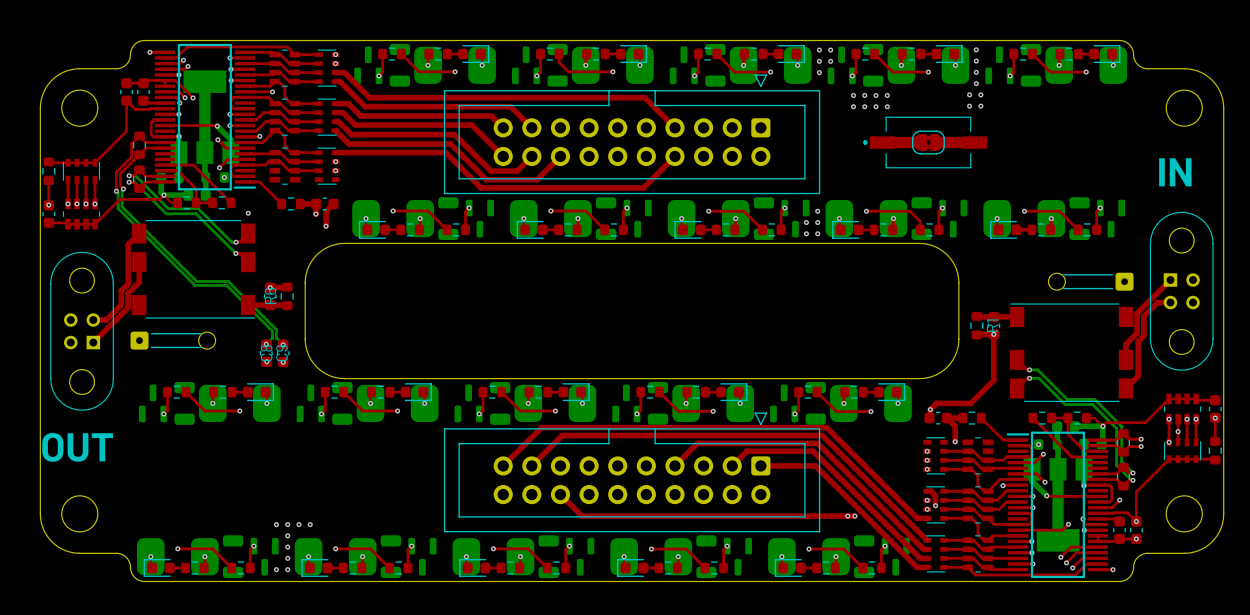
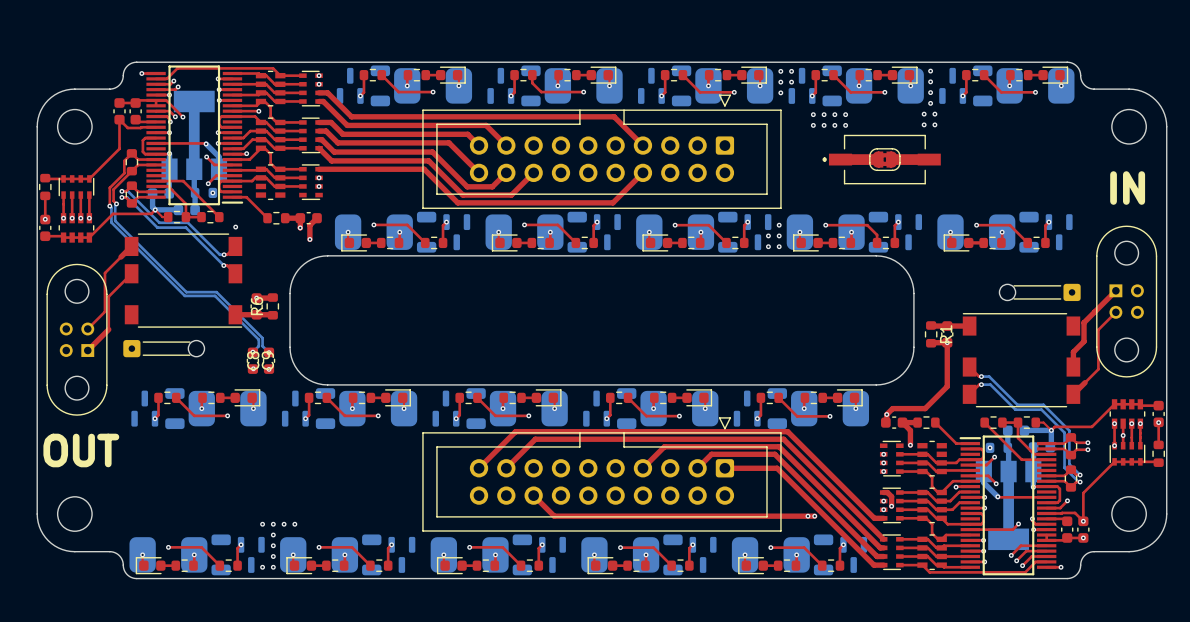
top track: (128, 244) (128, 283) (121, 290) (121, 304) (106, 320) (93, 320) -> (121, 257) (104, 273) (104, 311) (87, 329)
top track: (139, 262) (139, 282) (128, 293) (128, 307) (115, 320) -> (131, 273) (108, 296) (108, 329)
top track: (1170, 302) (1157, 302) (1143, 316) (1143, 335) (1138, 341) (1138, 376) -> (1115, 312) (1098, 329) (1098, 369) (1085, 382)

